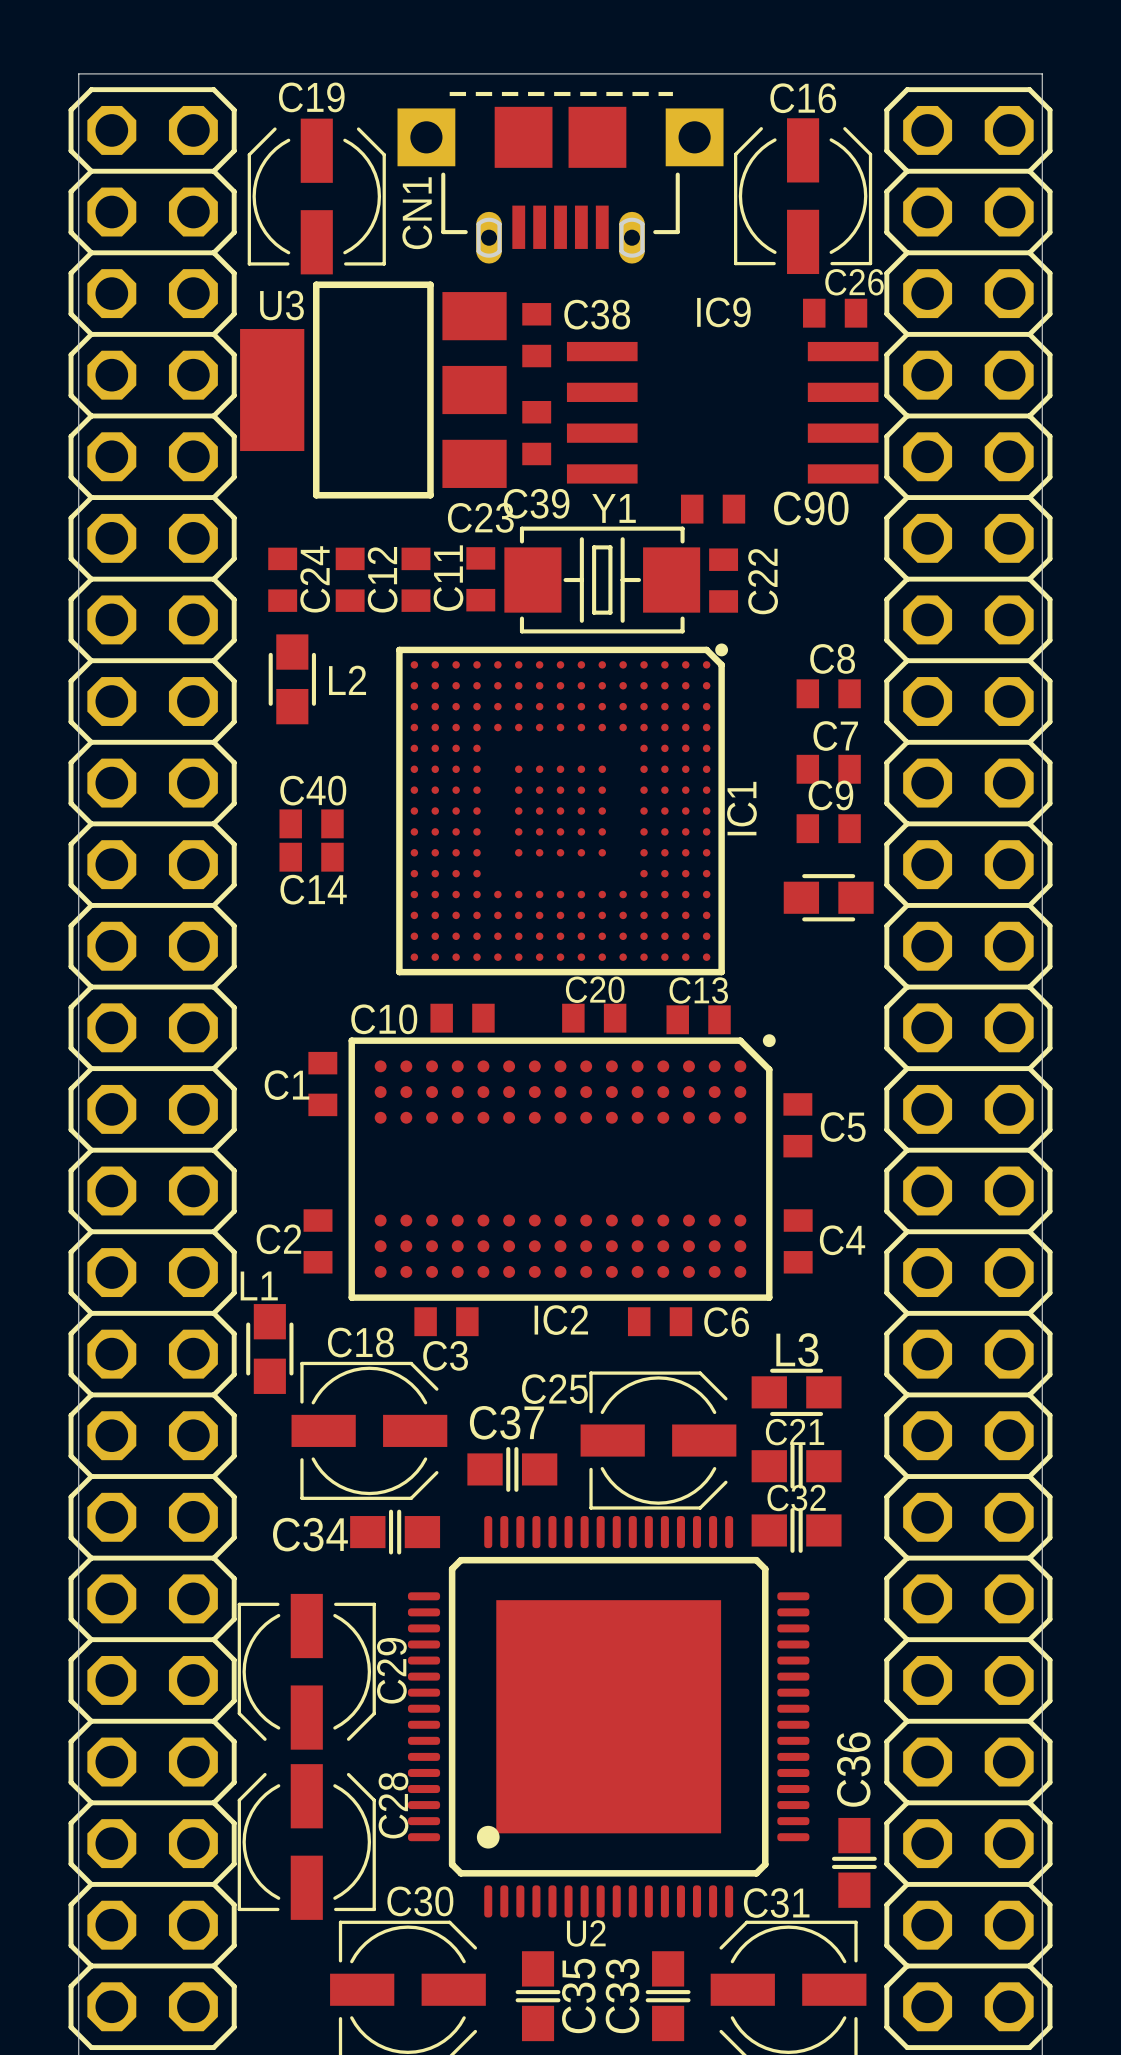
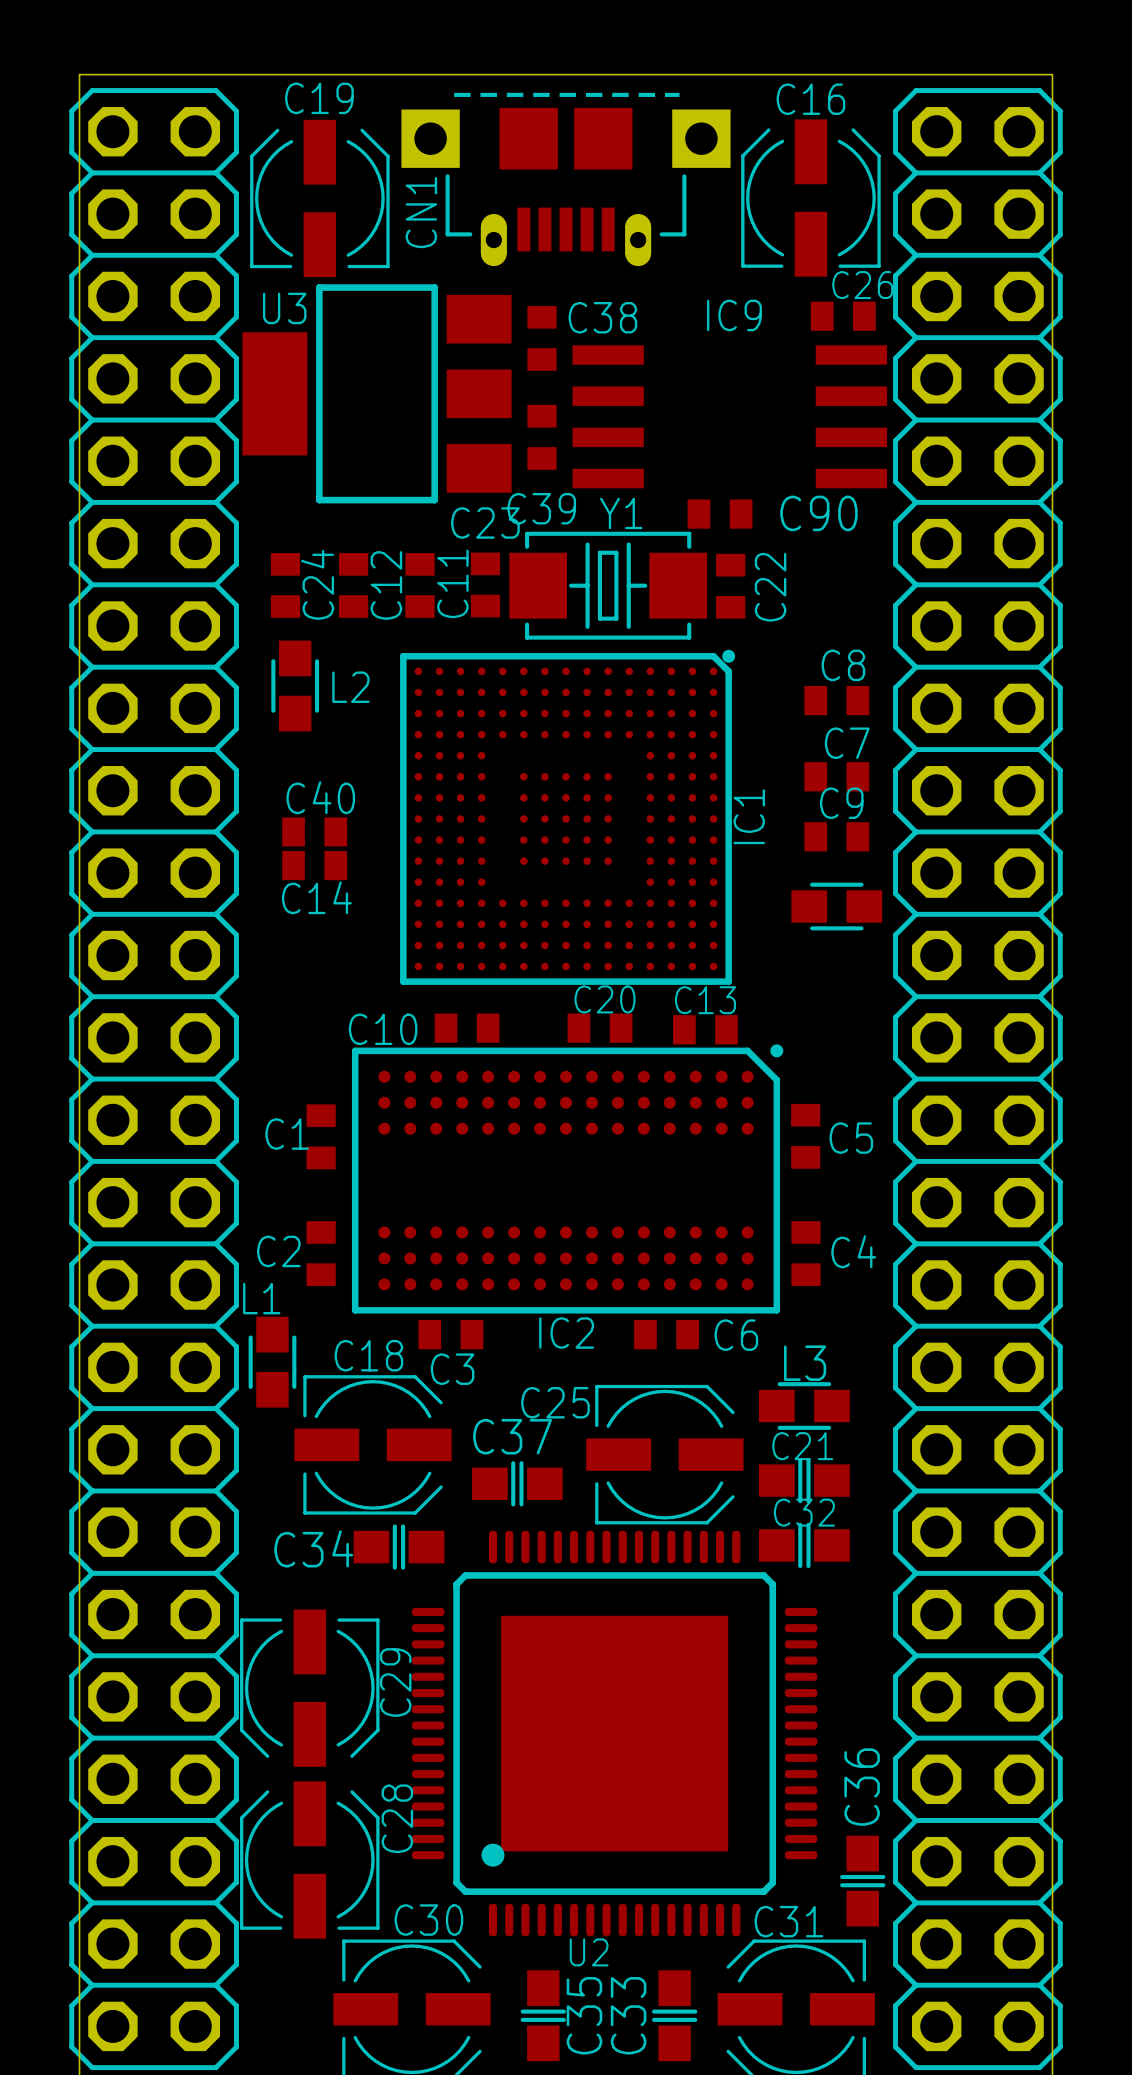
C1 position: (322, 1084) -> (321, 1136)
C1 name position: C1 (286, 1085) -> C1 (287, 1134)

